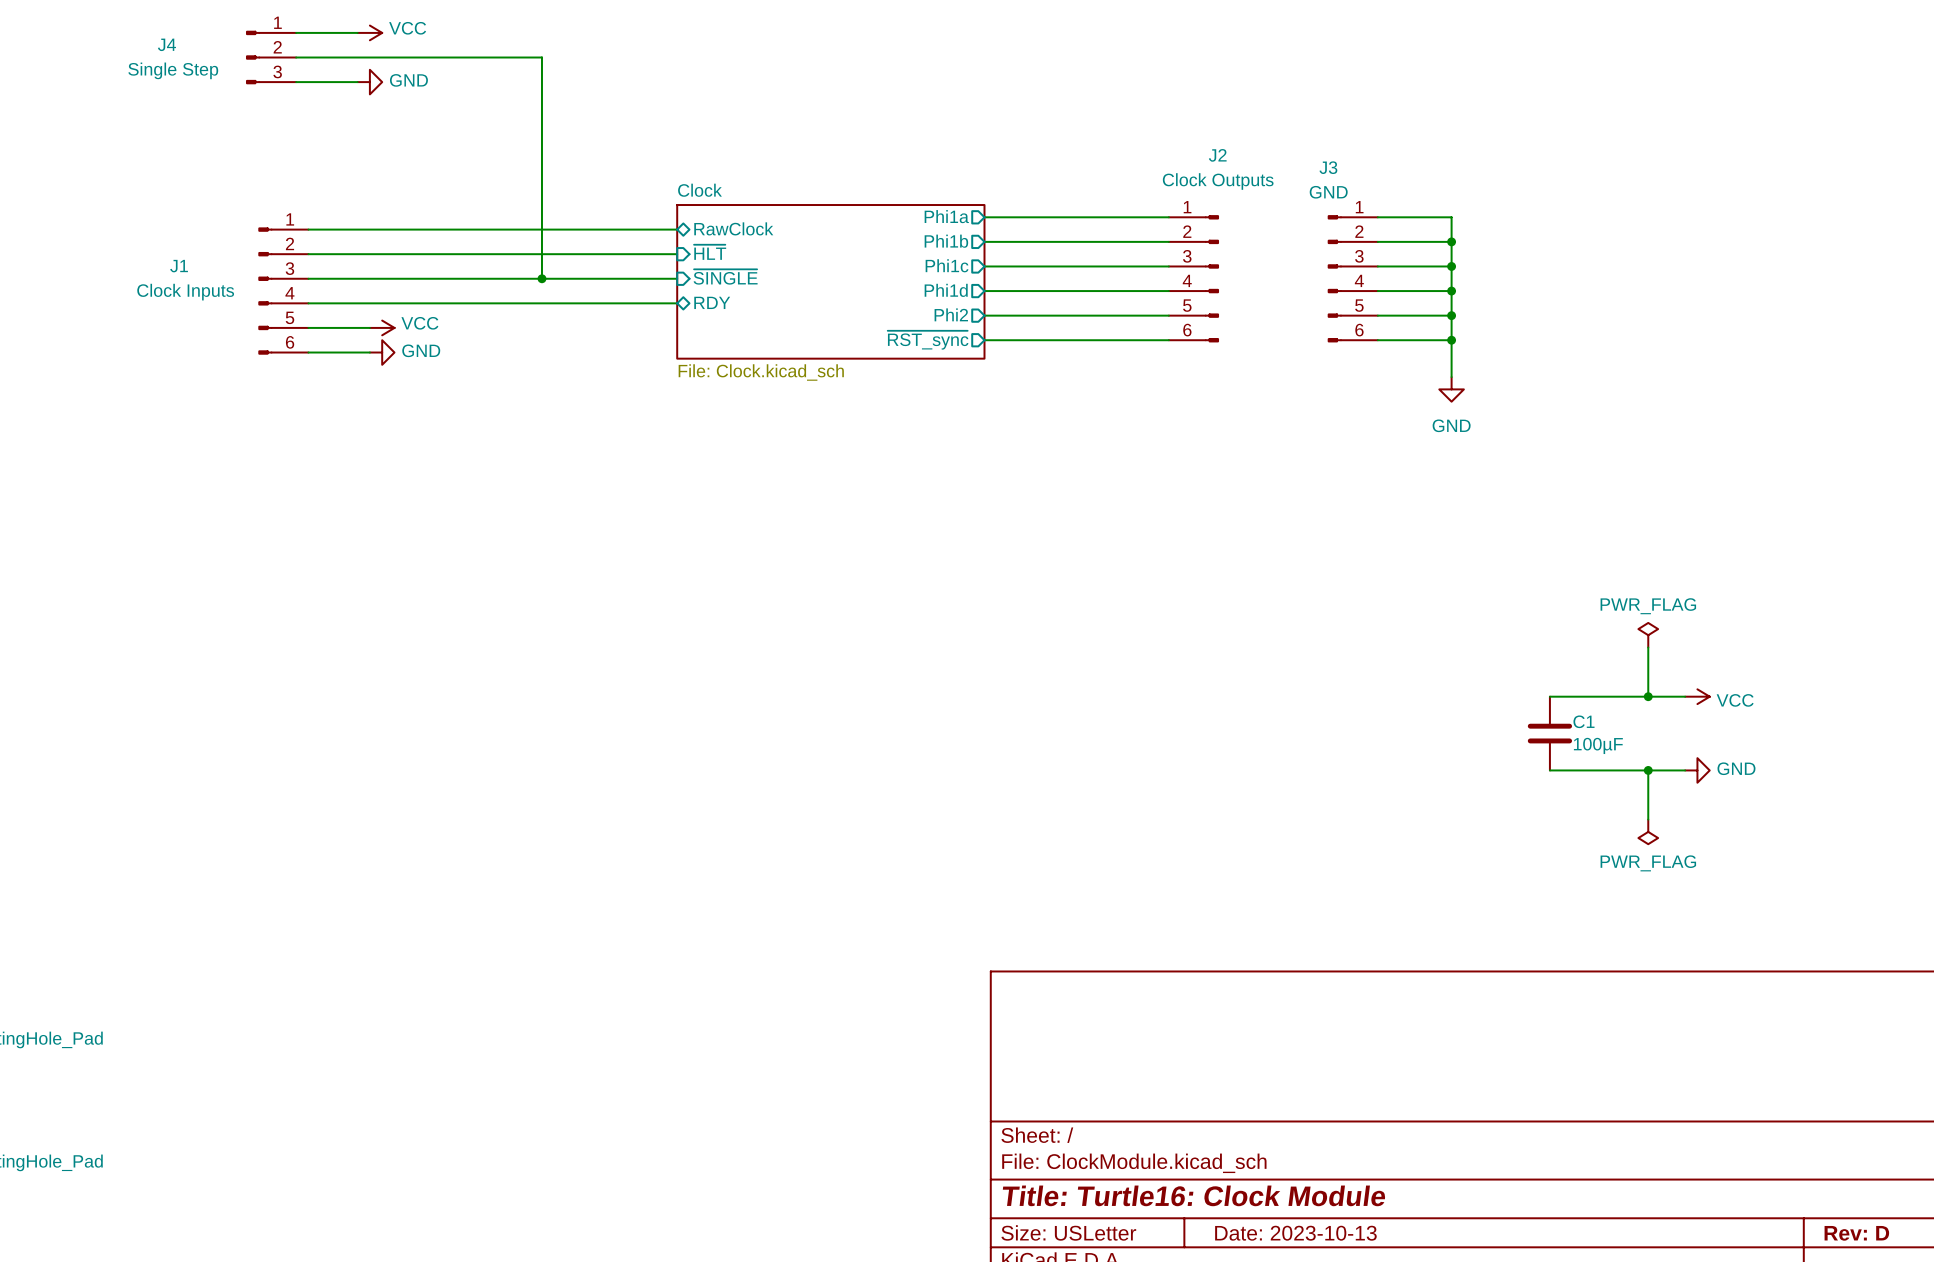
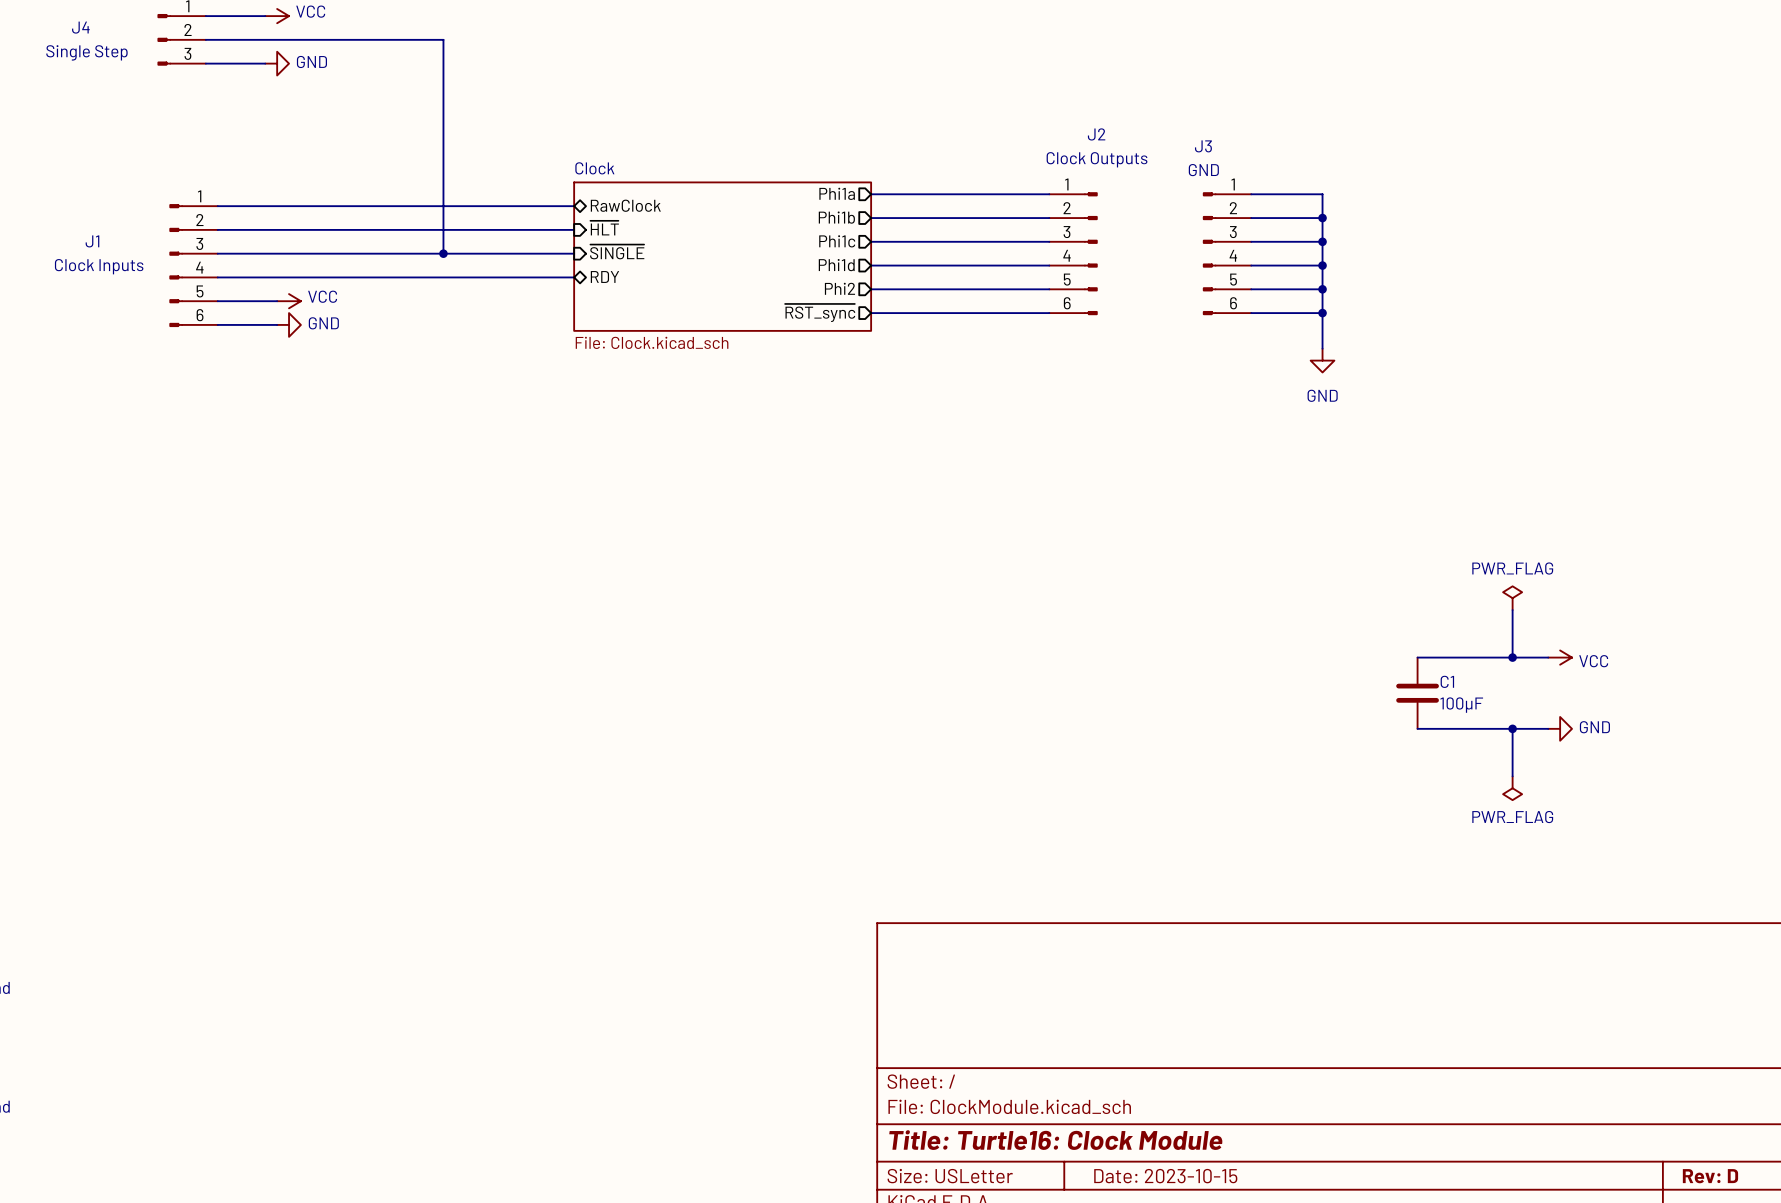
title block: Date: 2023-10-13 (1295, 1233) -> Date: 2023-10-15 (1165, 1176)

